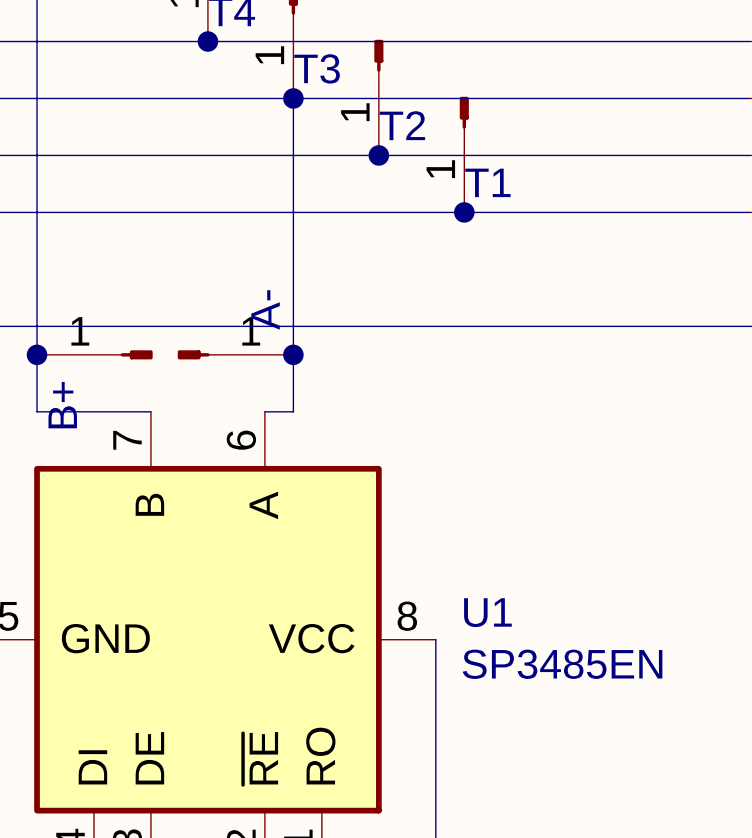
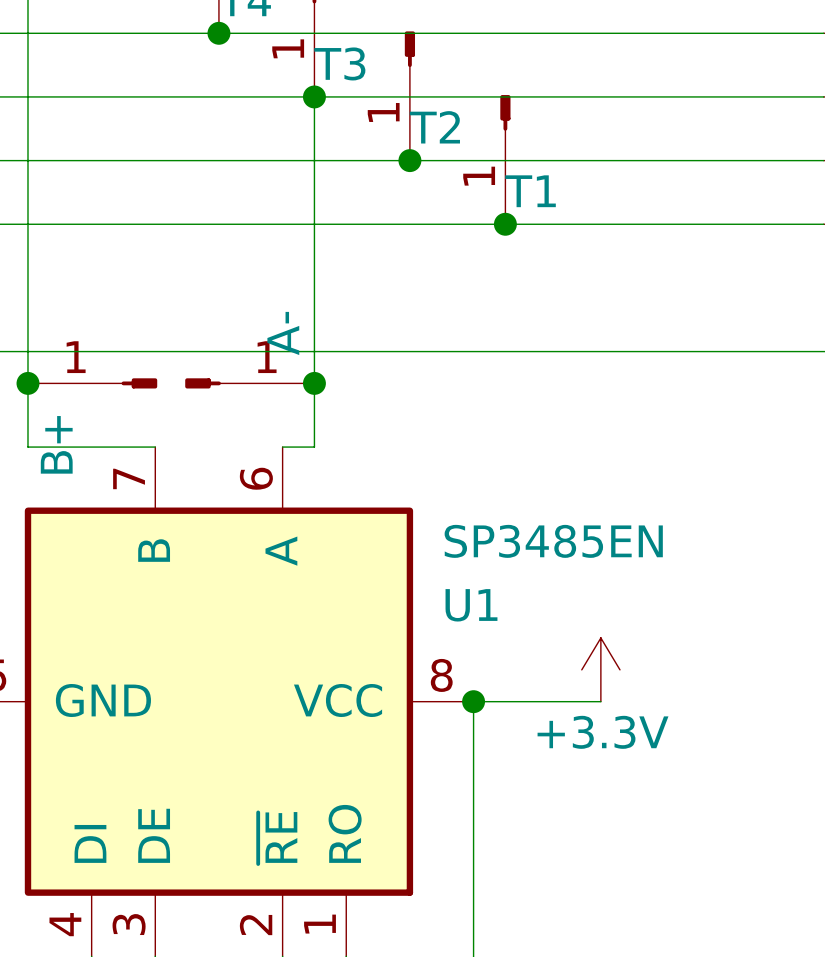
power symbol: none -> +3.3V (600, 669)
U1 name position: U1 (487, 612) -> U1 (471, 605)
wire: none -> (473, 701) (600, 701)
junction: none -> (473, 701)
U1 value position: SP3485EN (562, 664) -> SP3485EN (553, 541)

